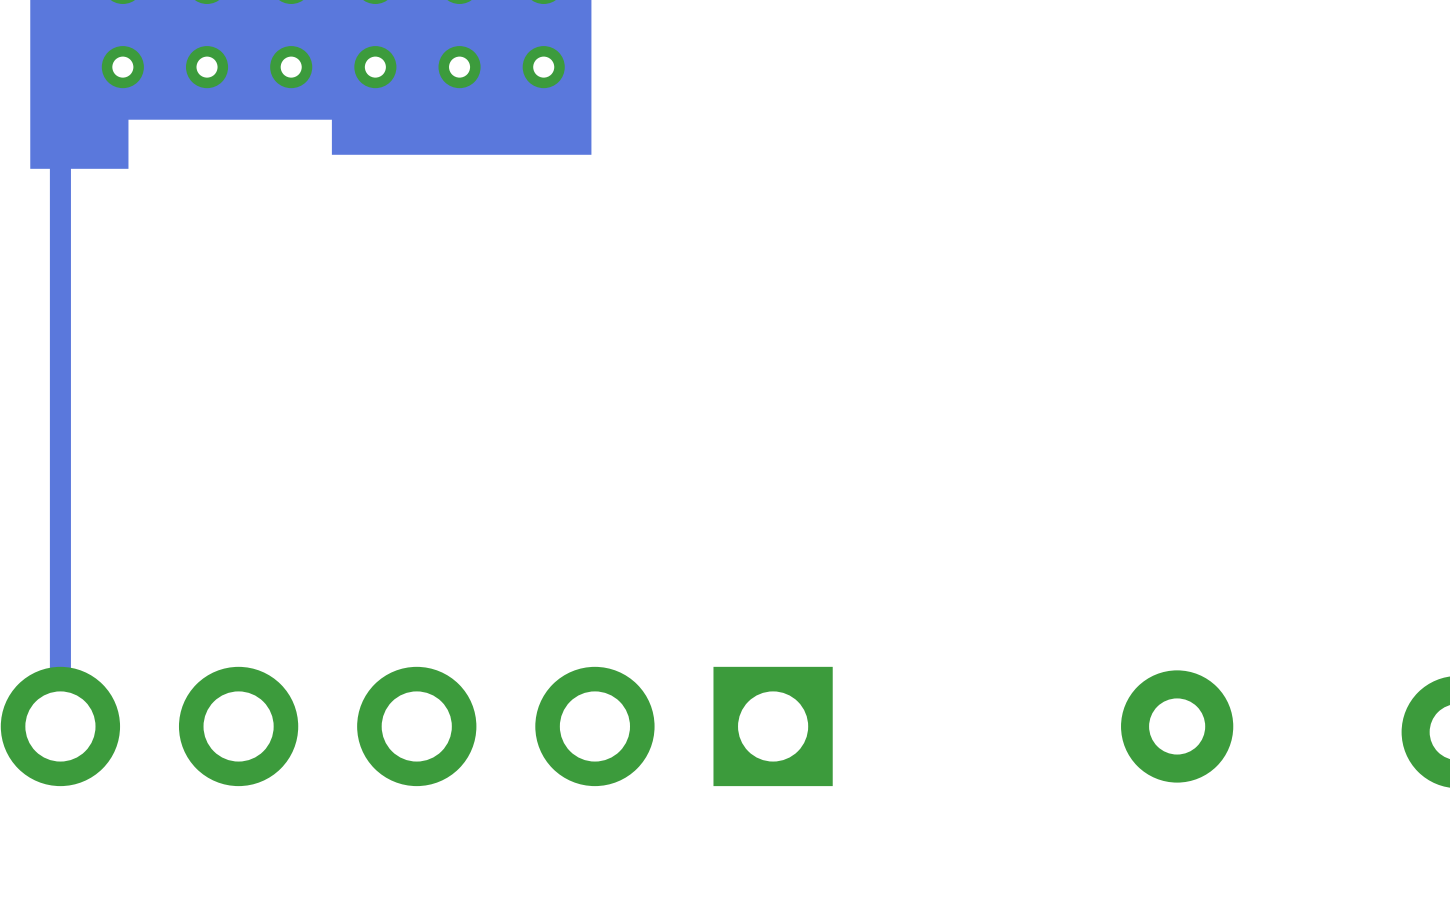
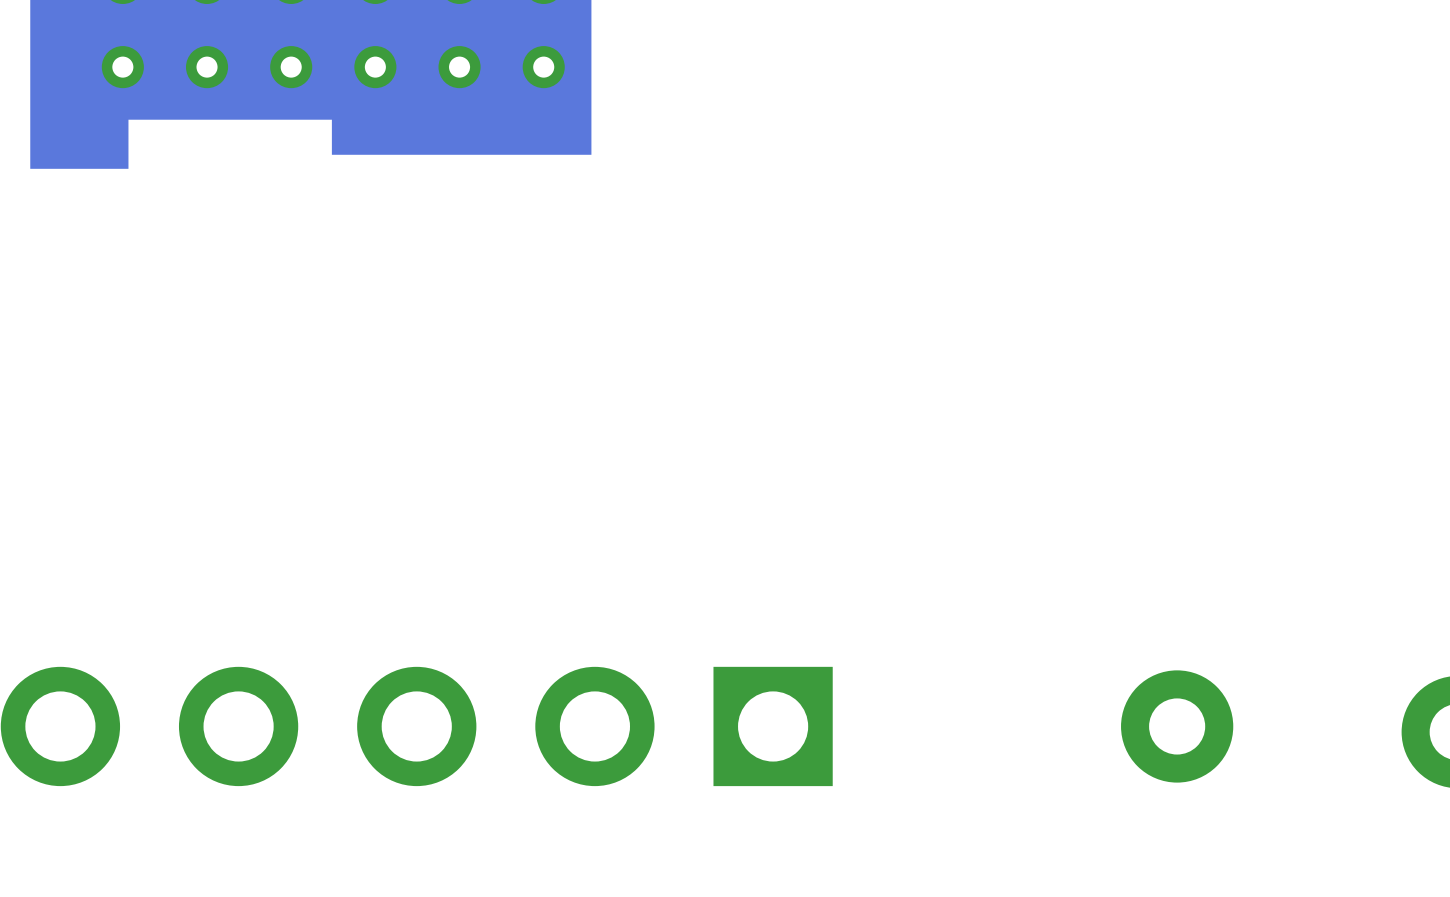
track: (122, 67) (60, 129) (60, 726) -> none

